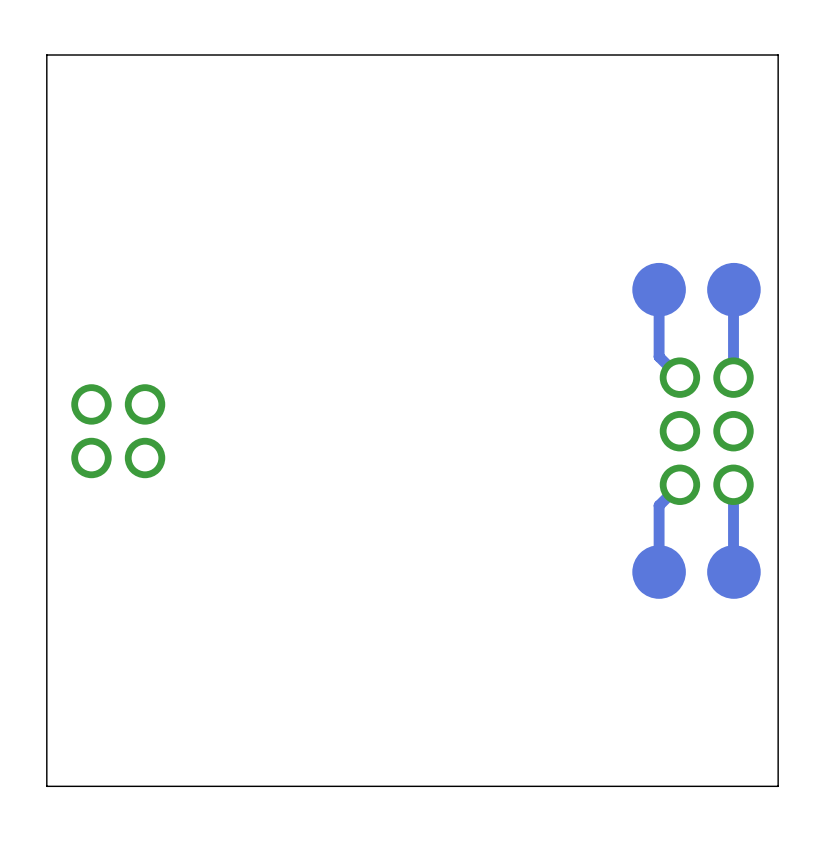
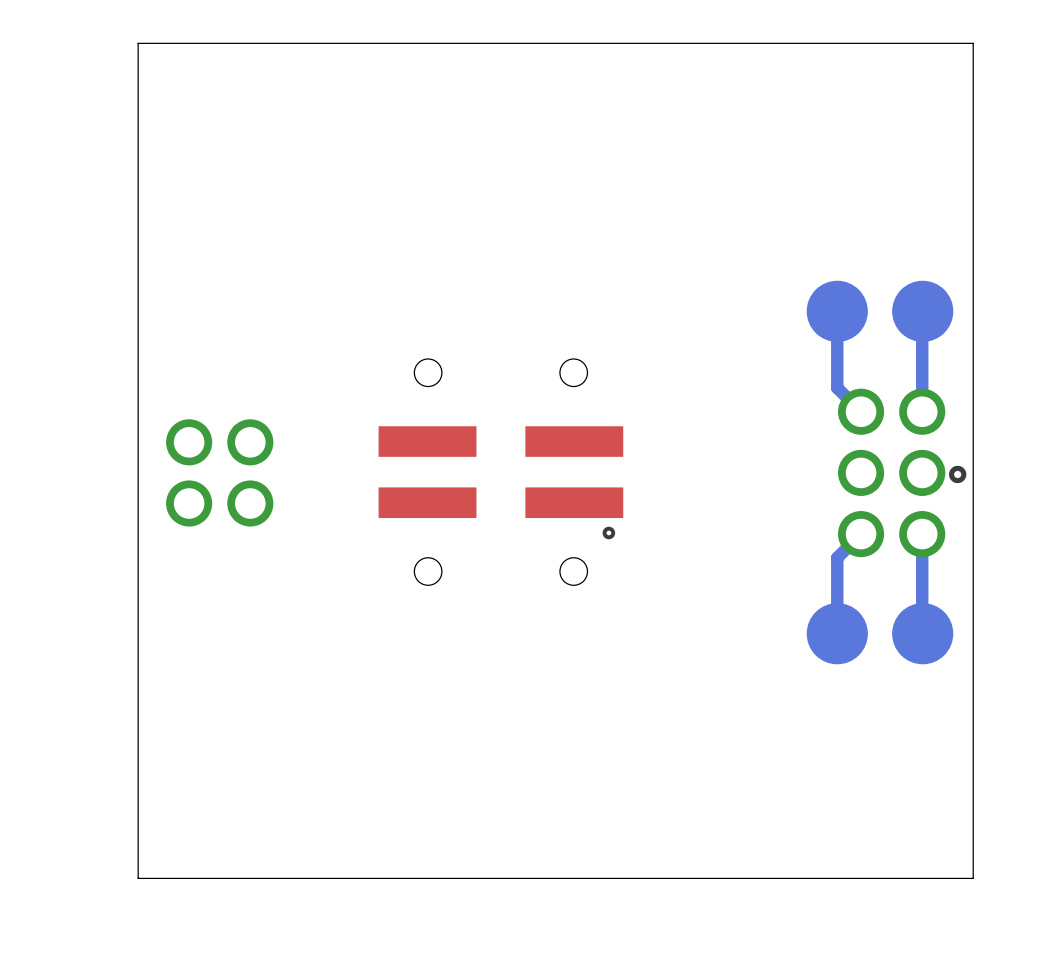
drawing: none -> [949, 465, 967, 484]
part: none -> (500, 472)

